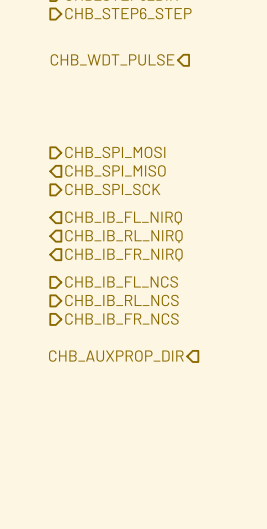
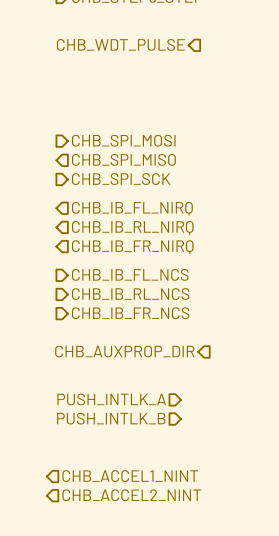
hierarchical label: none -> PUSH_INTLK_A (111, 399)
hierarchical label: none -> PUSH_INTLK_B (111, 418)
hierarchical label: none -> CHB_ACCEL1_NINT (130, 476)
hierarchical label: none -> CHB_ACCEL2_NINT (131, 495)

